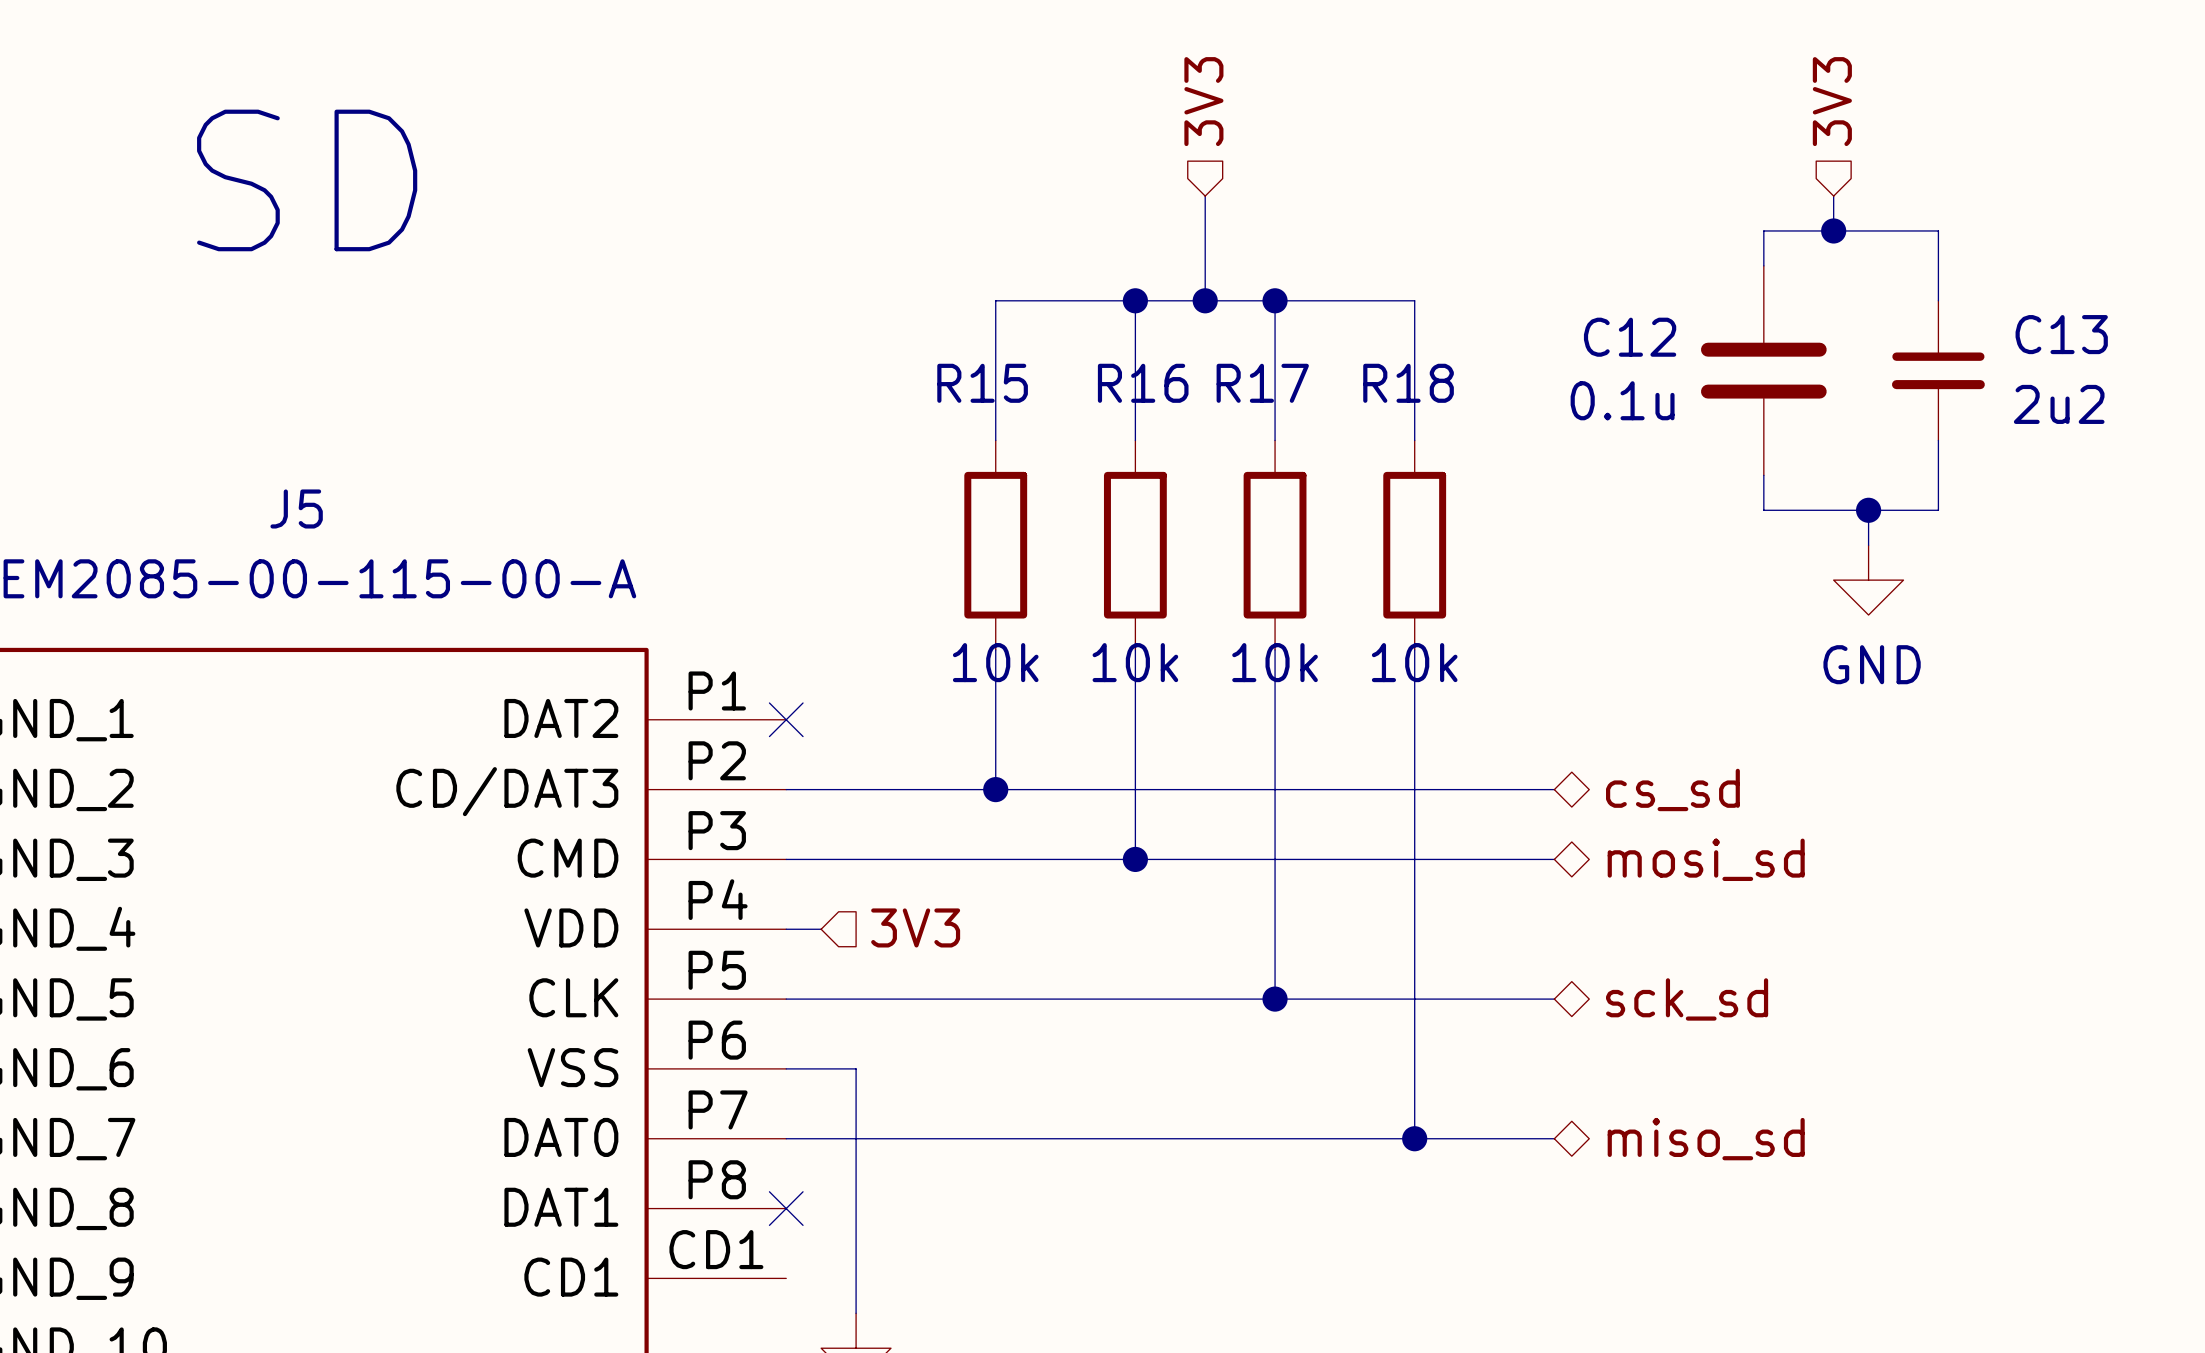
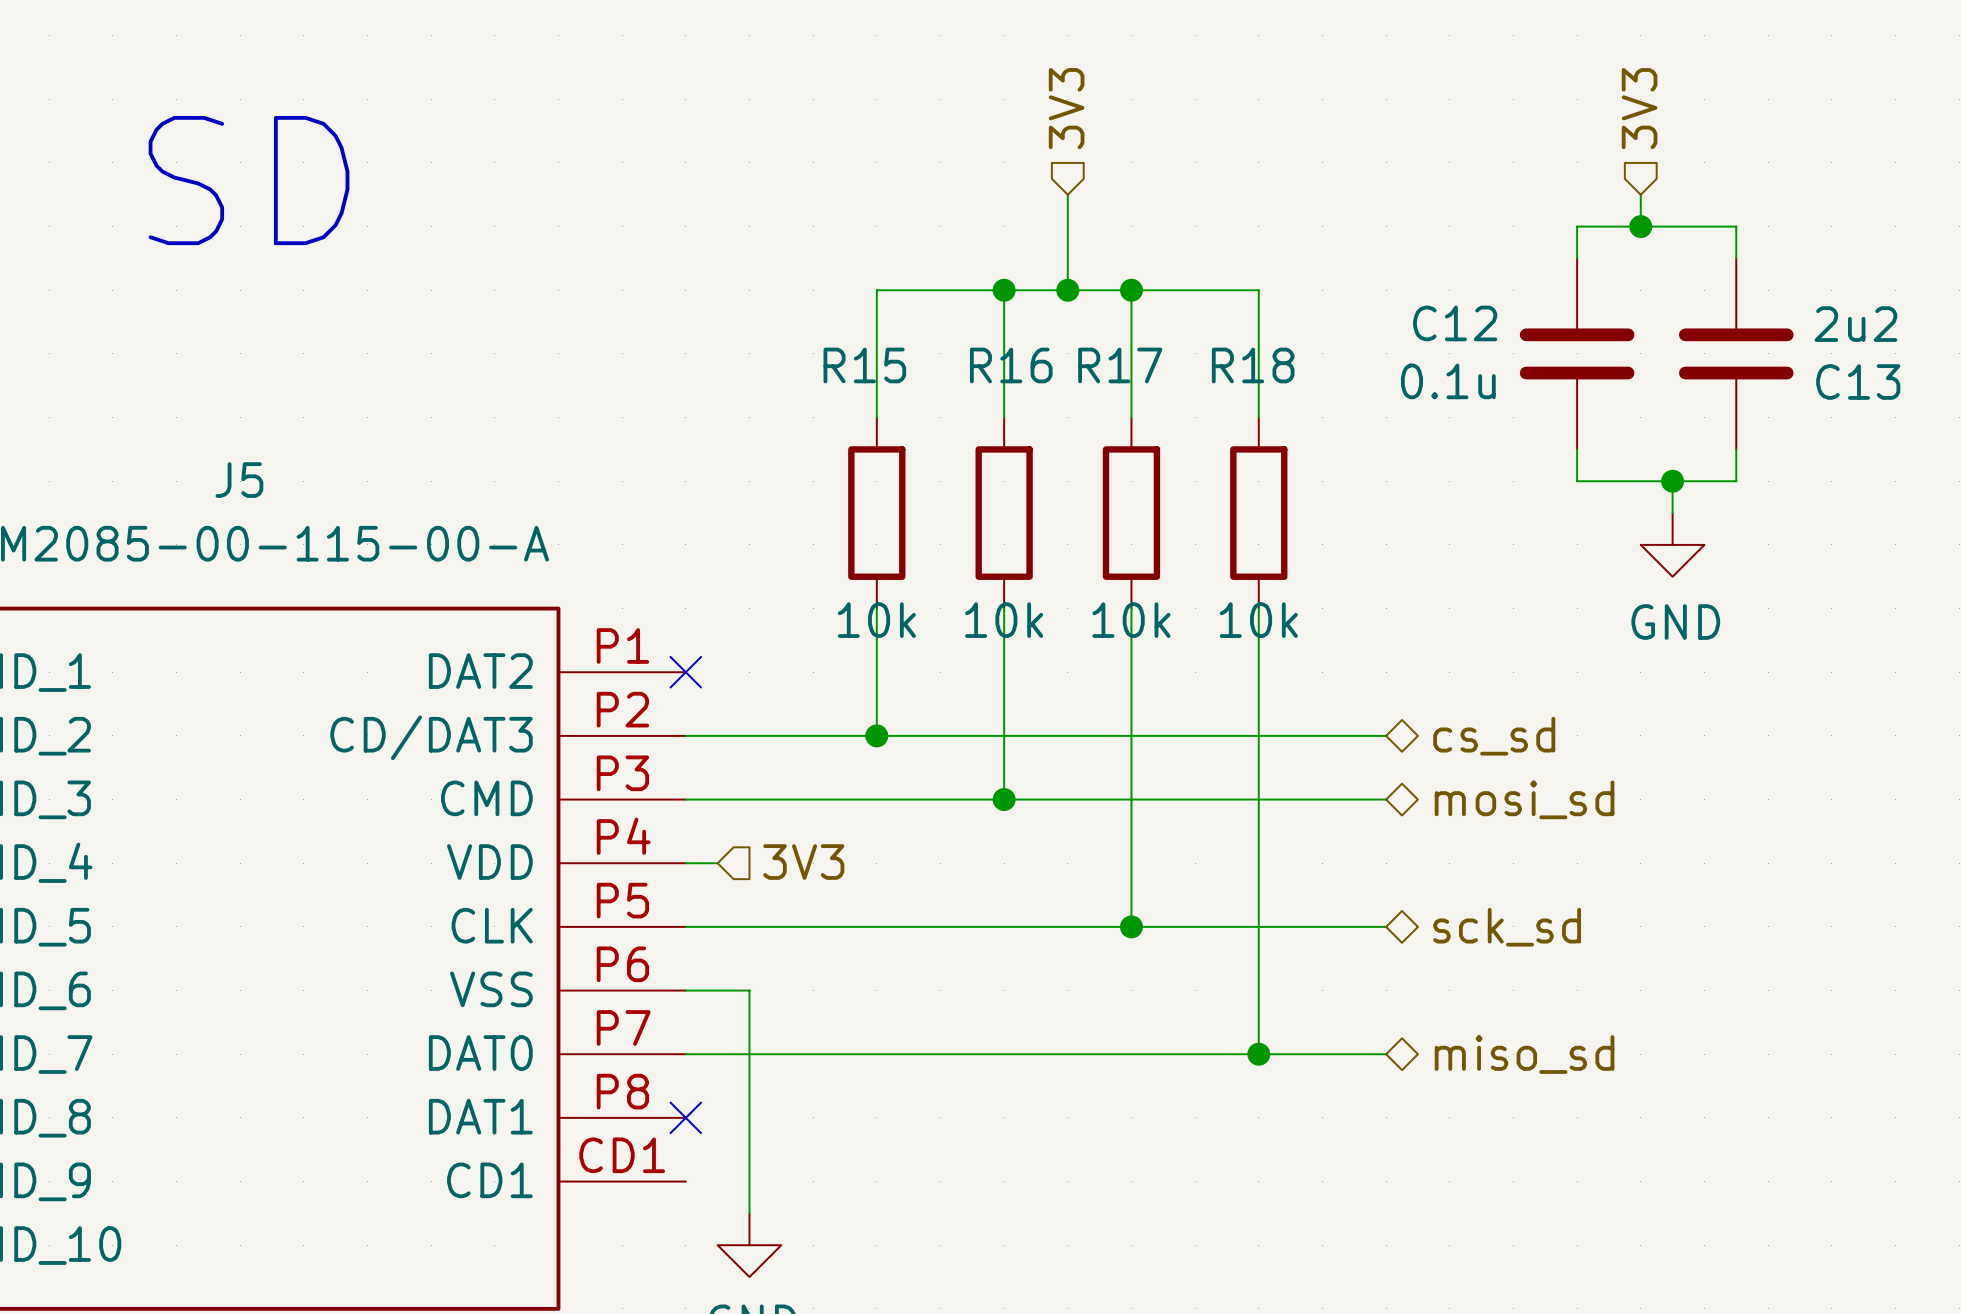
C13 symbol: [1891, 300, 1985, 441] -> [1678, 258, 1794, 450]
C13 name position: C13 (2061, 334) -> C13 (1858, 382)
C13 value position: 2u2 (2059, 404) -> 2u2 (1855, 324)

